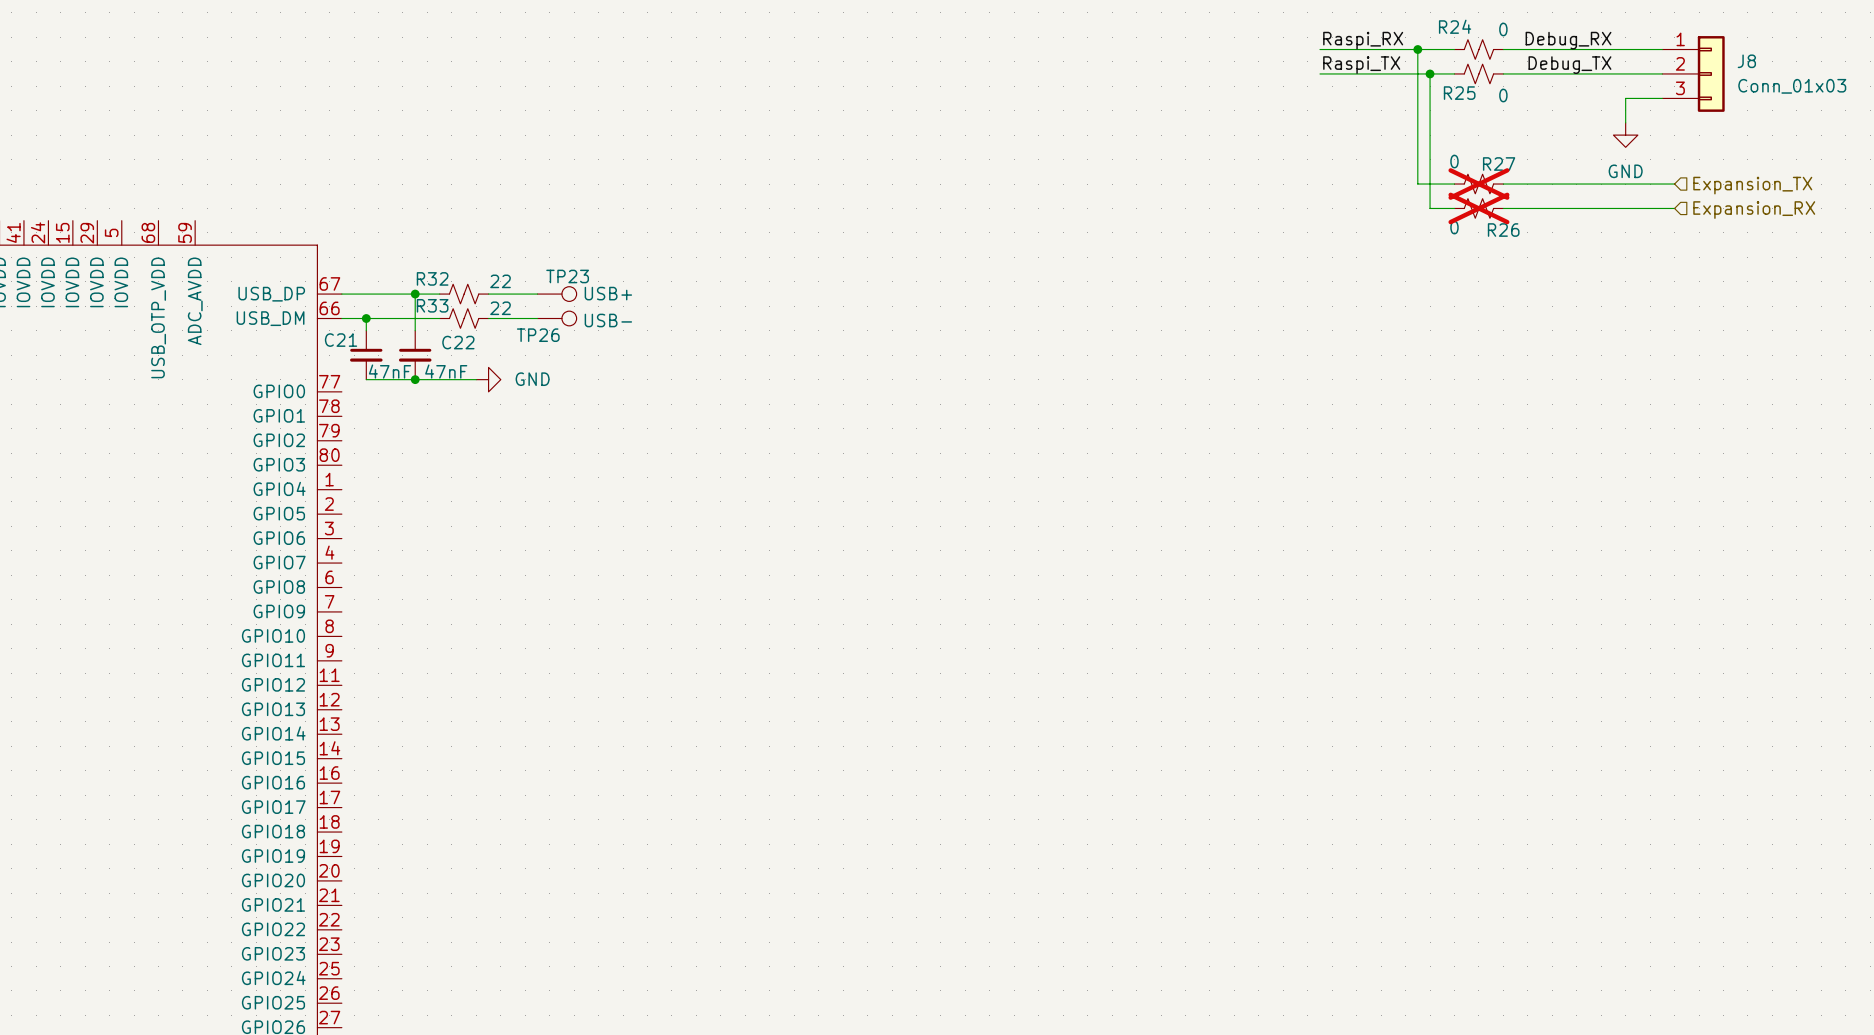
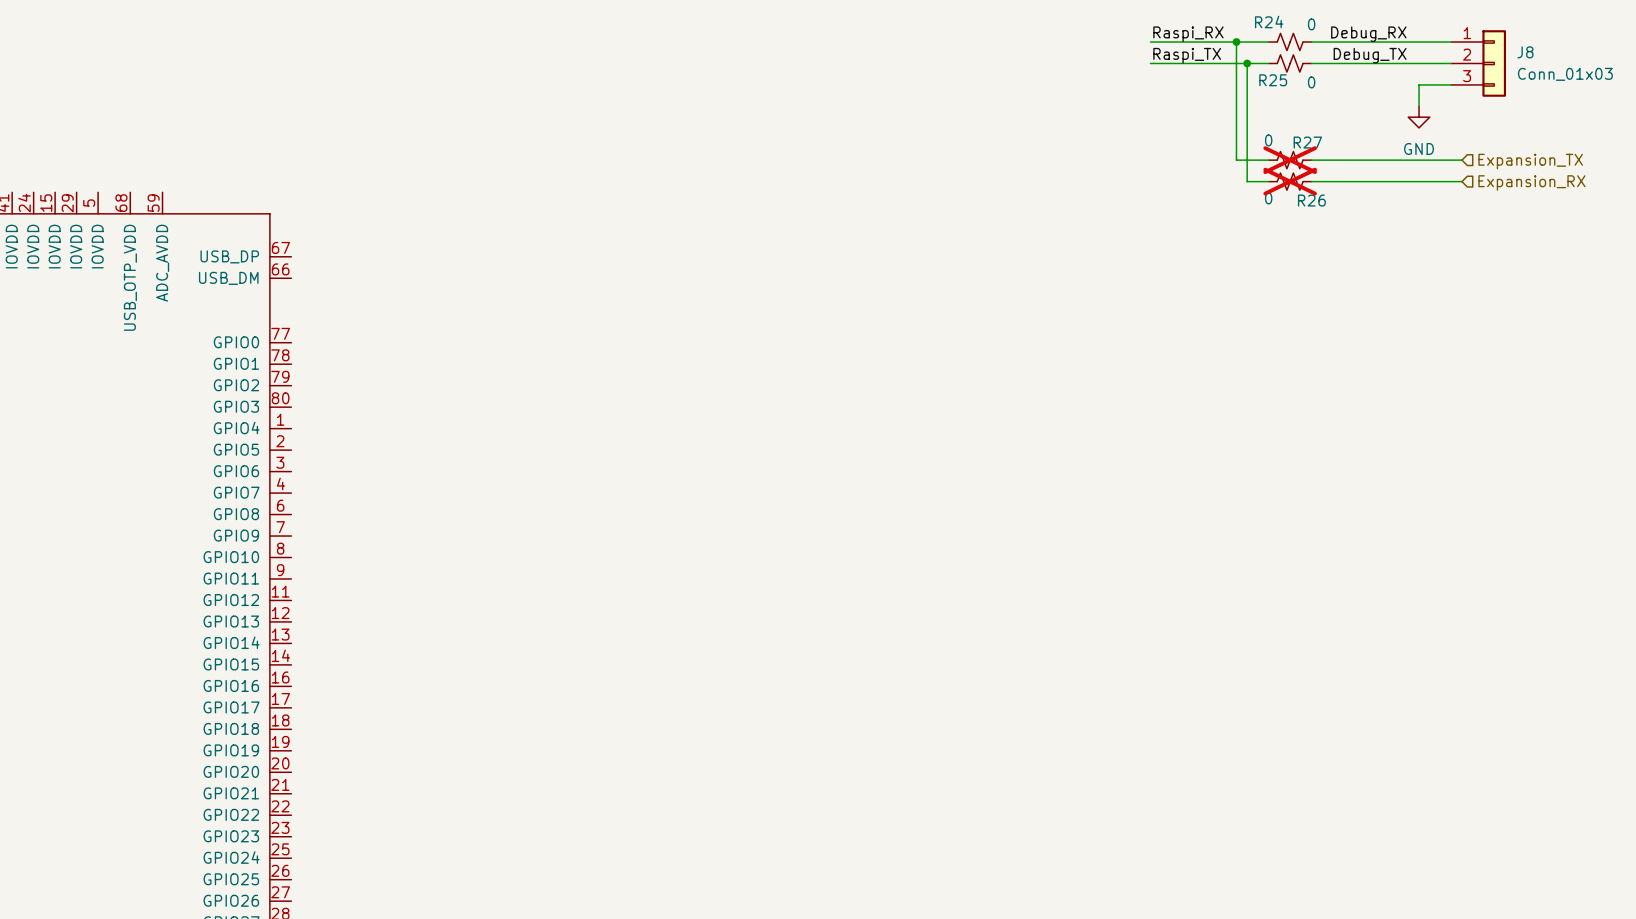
wire: (341, 294) (439, 294) -> none
wire: (415, 294) (415, 330) -> none
junction: (415, 294) -> none
R32: 22 (464, 294) -> none
wire: (488, 294) (537, 294) -> none
TP23: USB+ (557, 294) -> none
wire: (341, 318) (439, 318) -> none
wire: (366, 318) (366, 330) -> none
junction: (366, 318) -> none
R33: 22 (464, 318) -> none
wire: (488, 318) (537, 318) -> none
TP26: USB- (557, 318) -> none
C21: 47nF (366, 355) -> none
C22: 47nF (415, 355) -> none
wire: (366, 379) (476, 379) -> none
junction: (415, 379) -> none
power symbol: GND (488, 379) -> none

